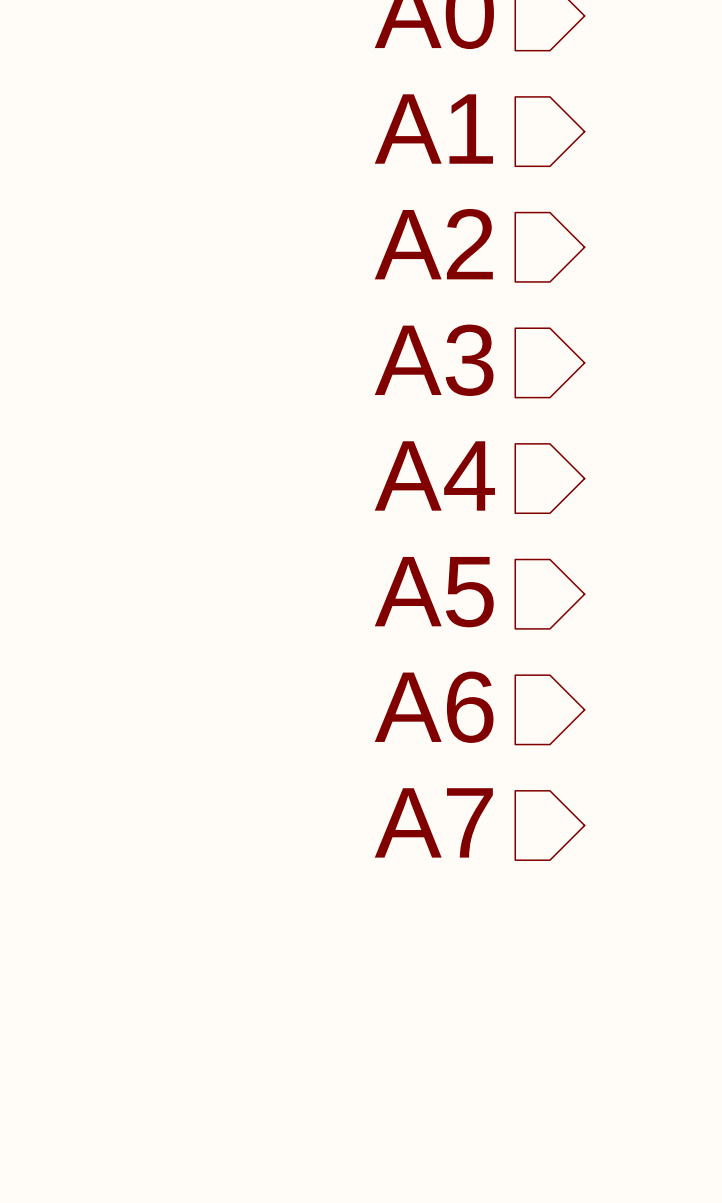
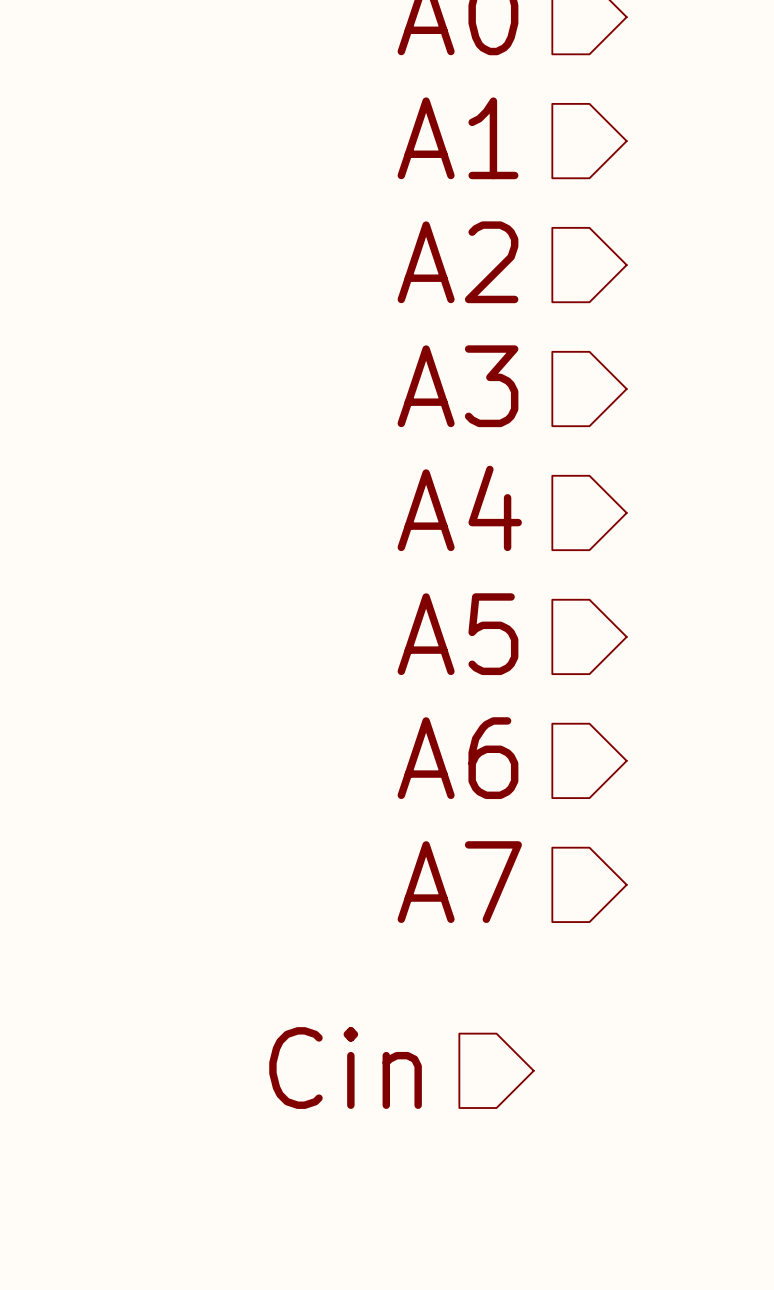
hierarchical label: none -> Cin (345, 1068)

